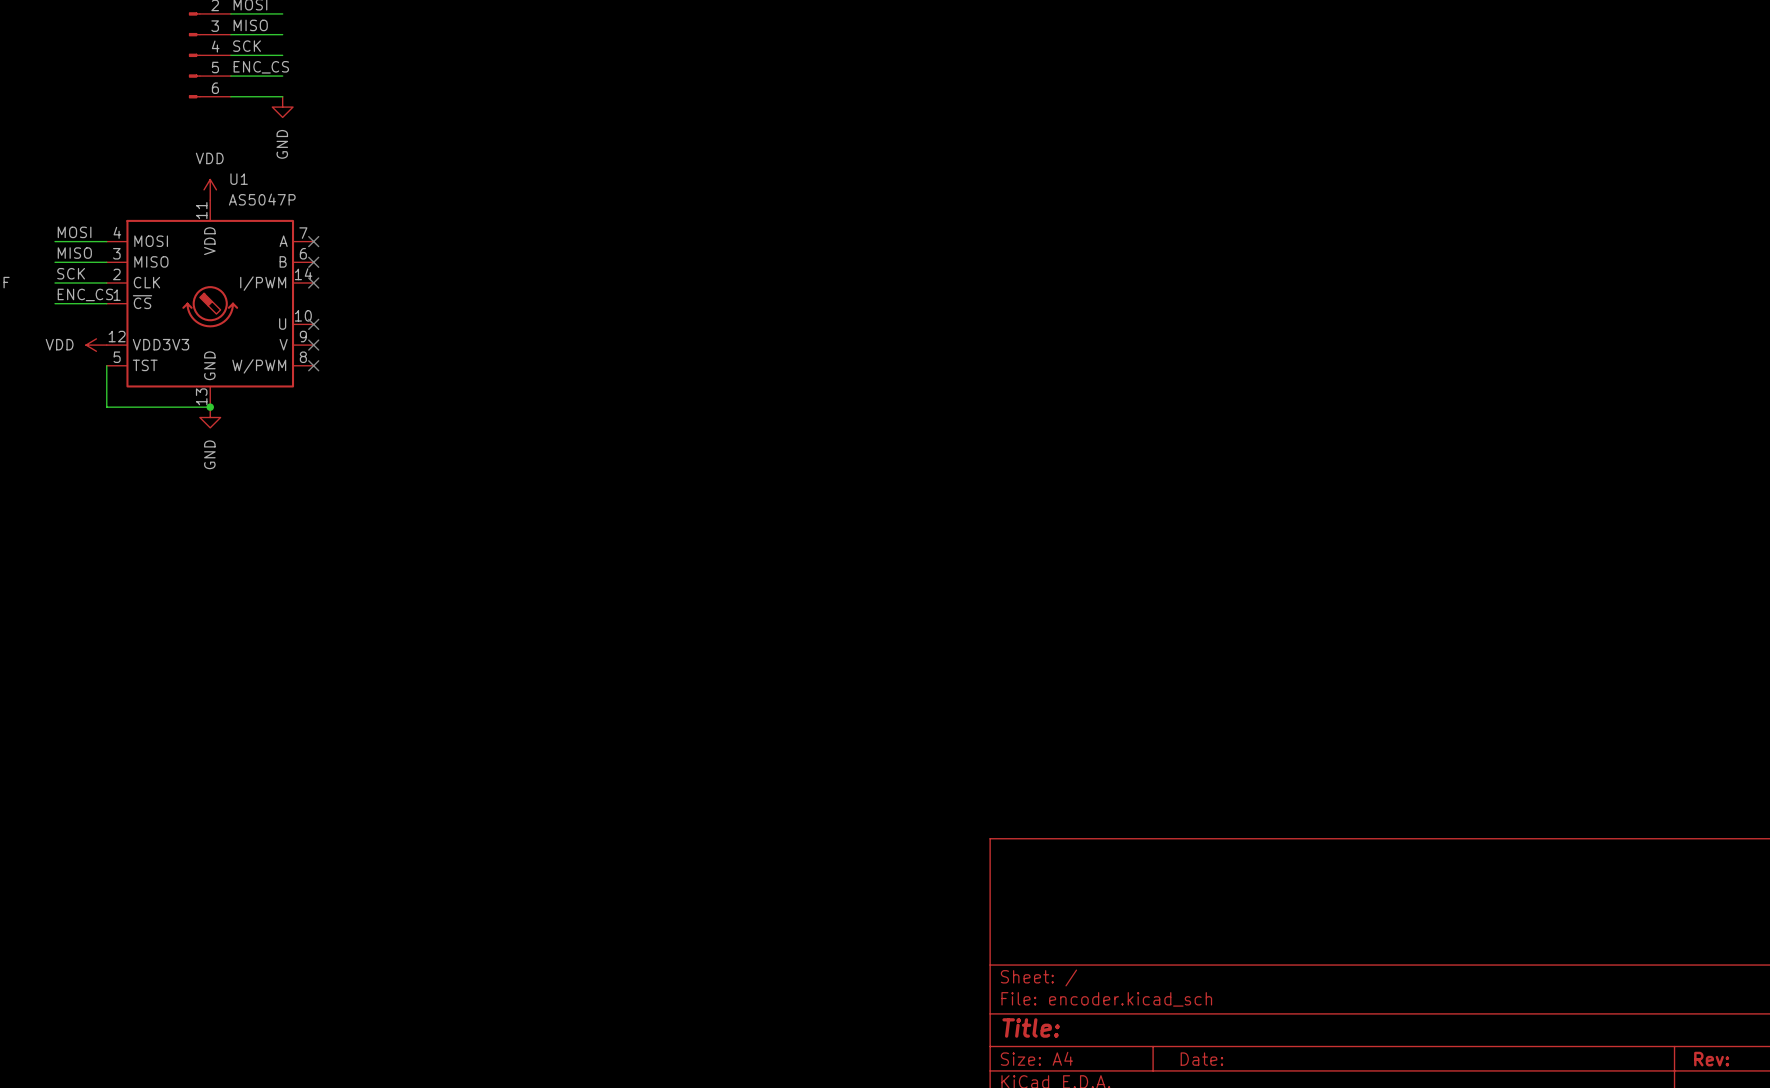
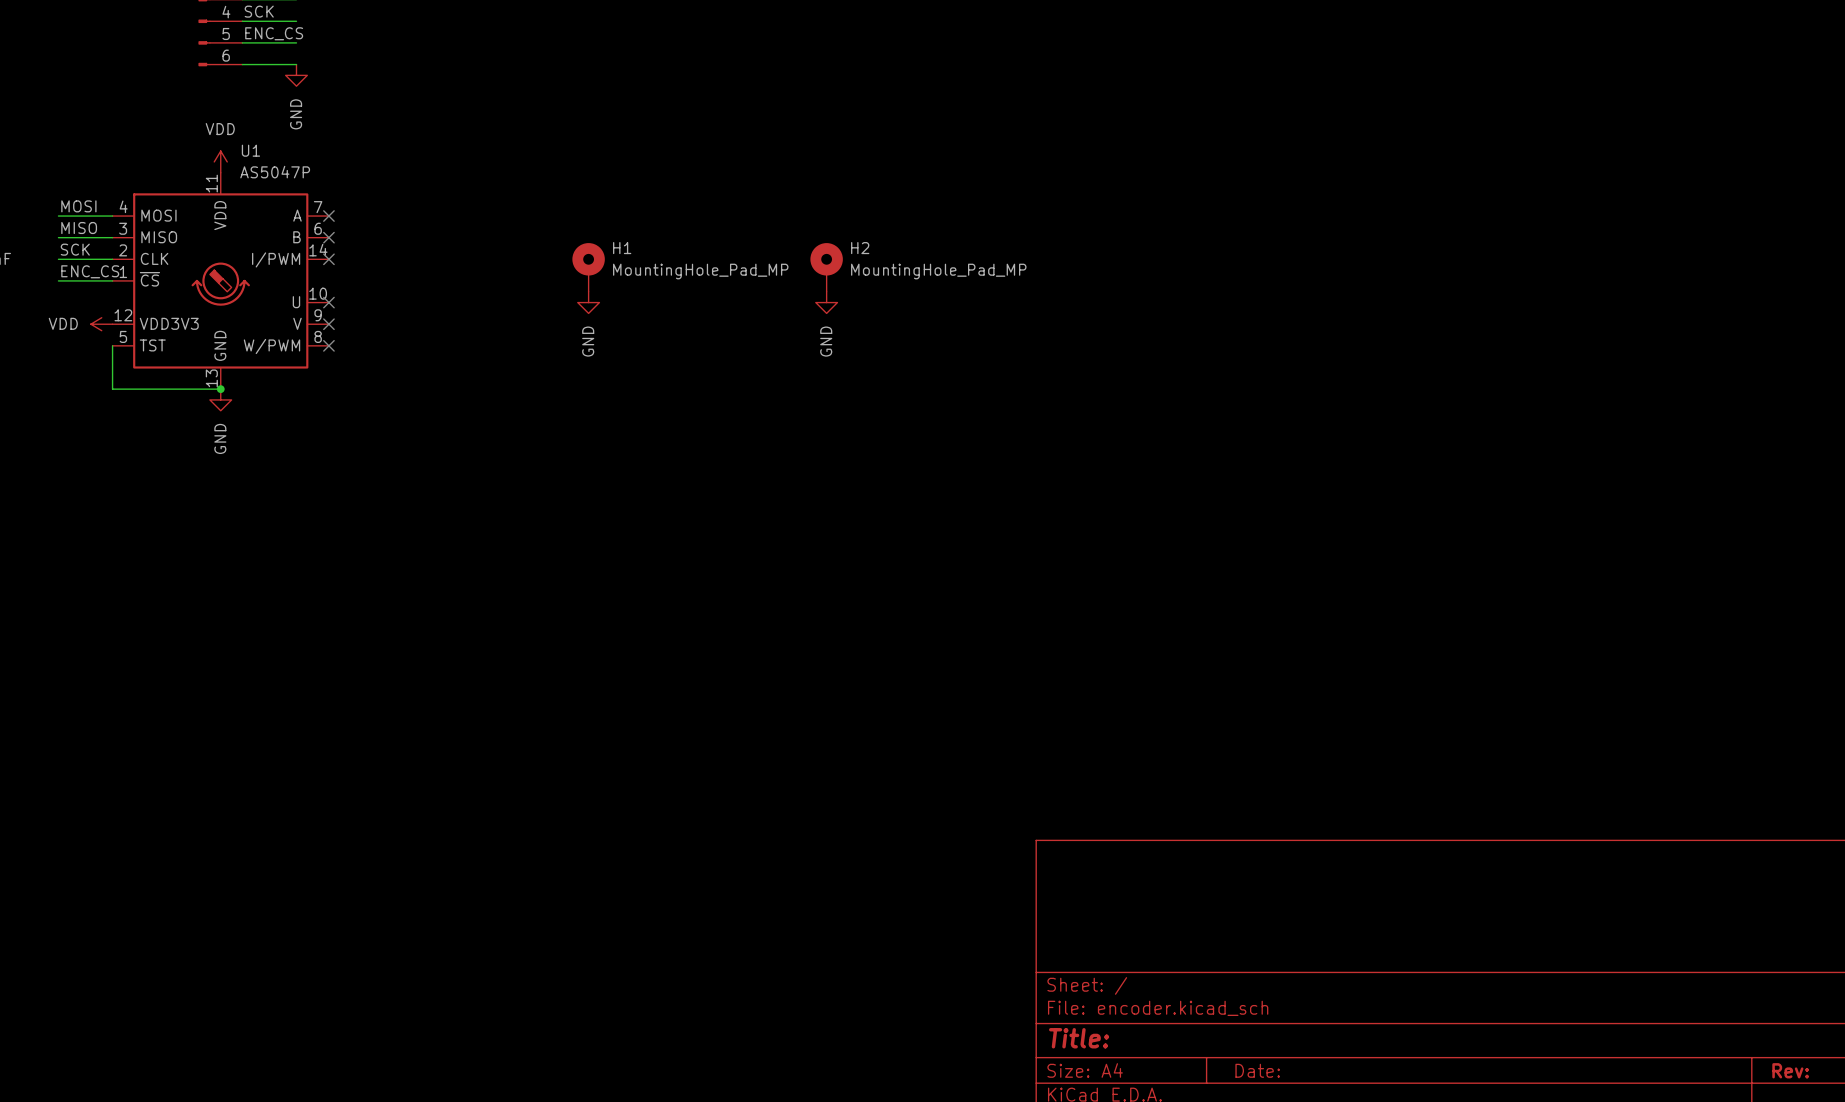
H1: none -> MountingHole_Pad_MP (588, 267)
H2: none -> MountingHole_Pad_MP (826, 267)
power symbol: none -> GND (588, 302)
power symbol: none -> GND (826, 302)

